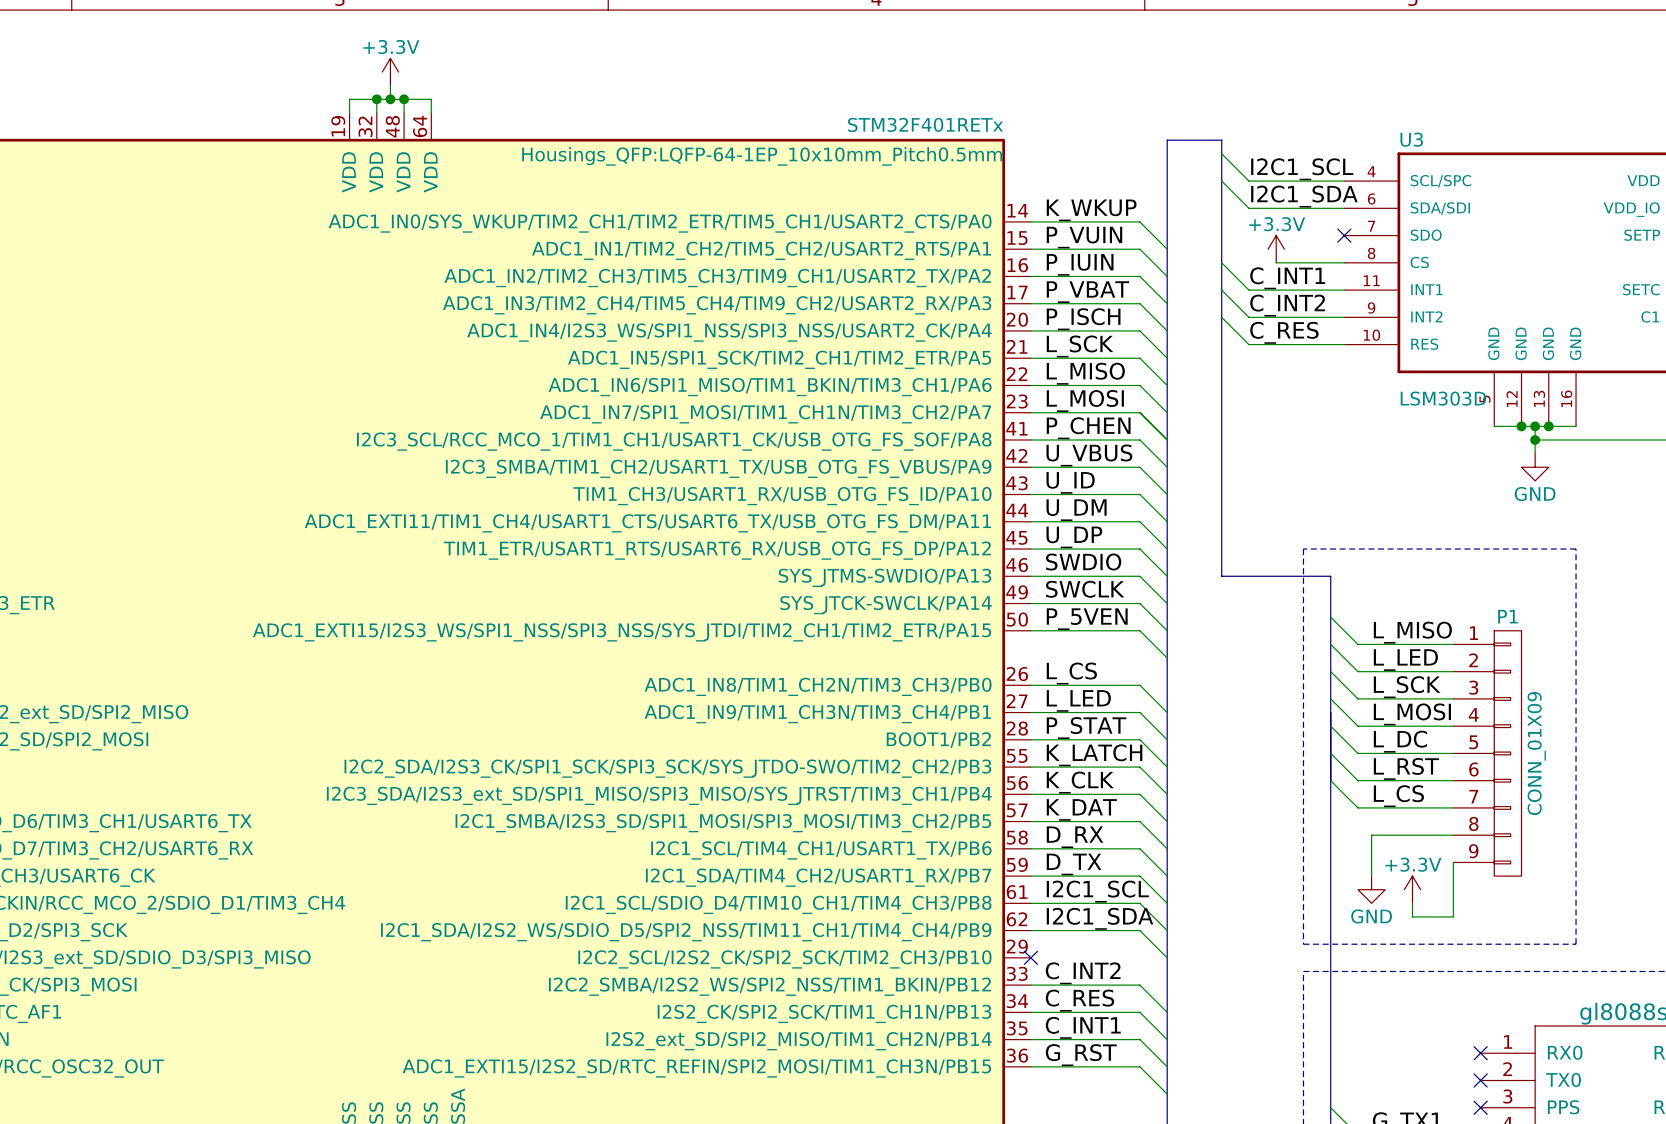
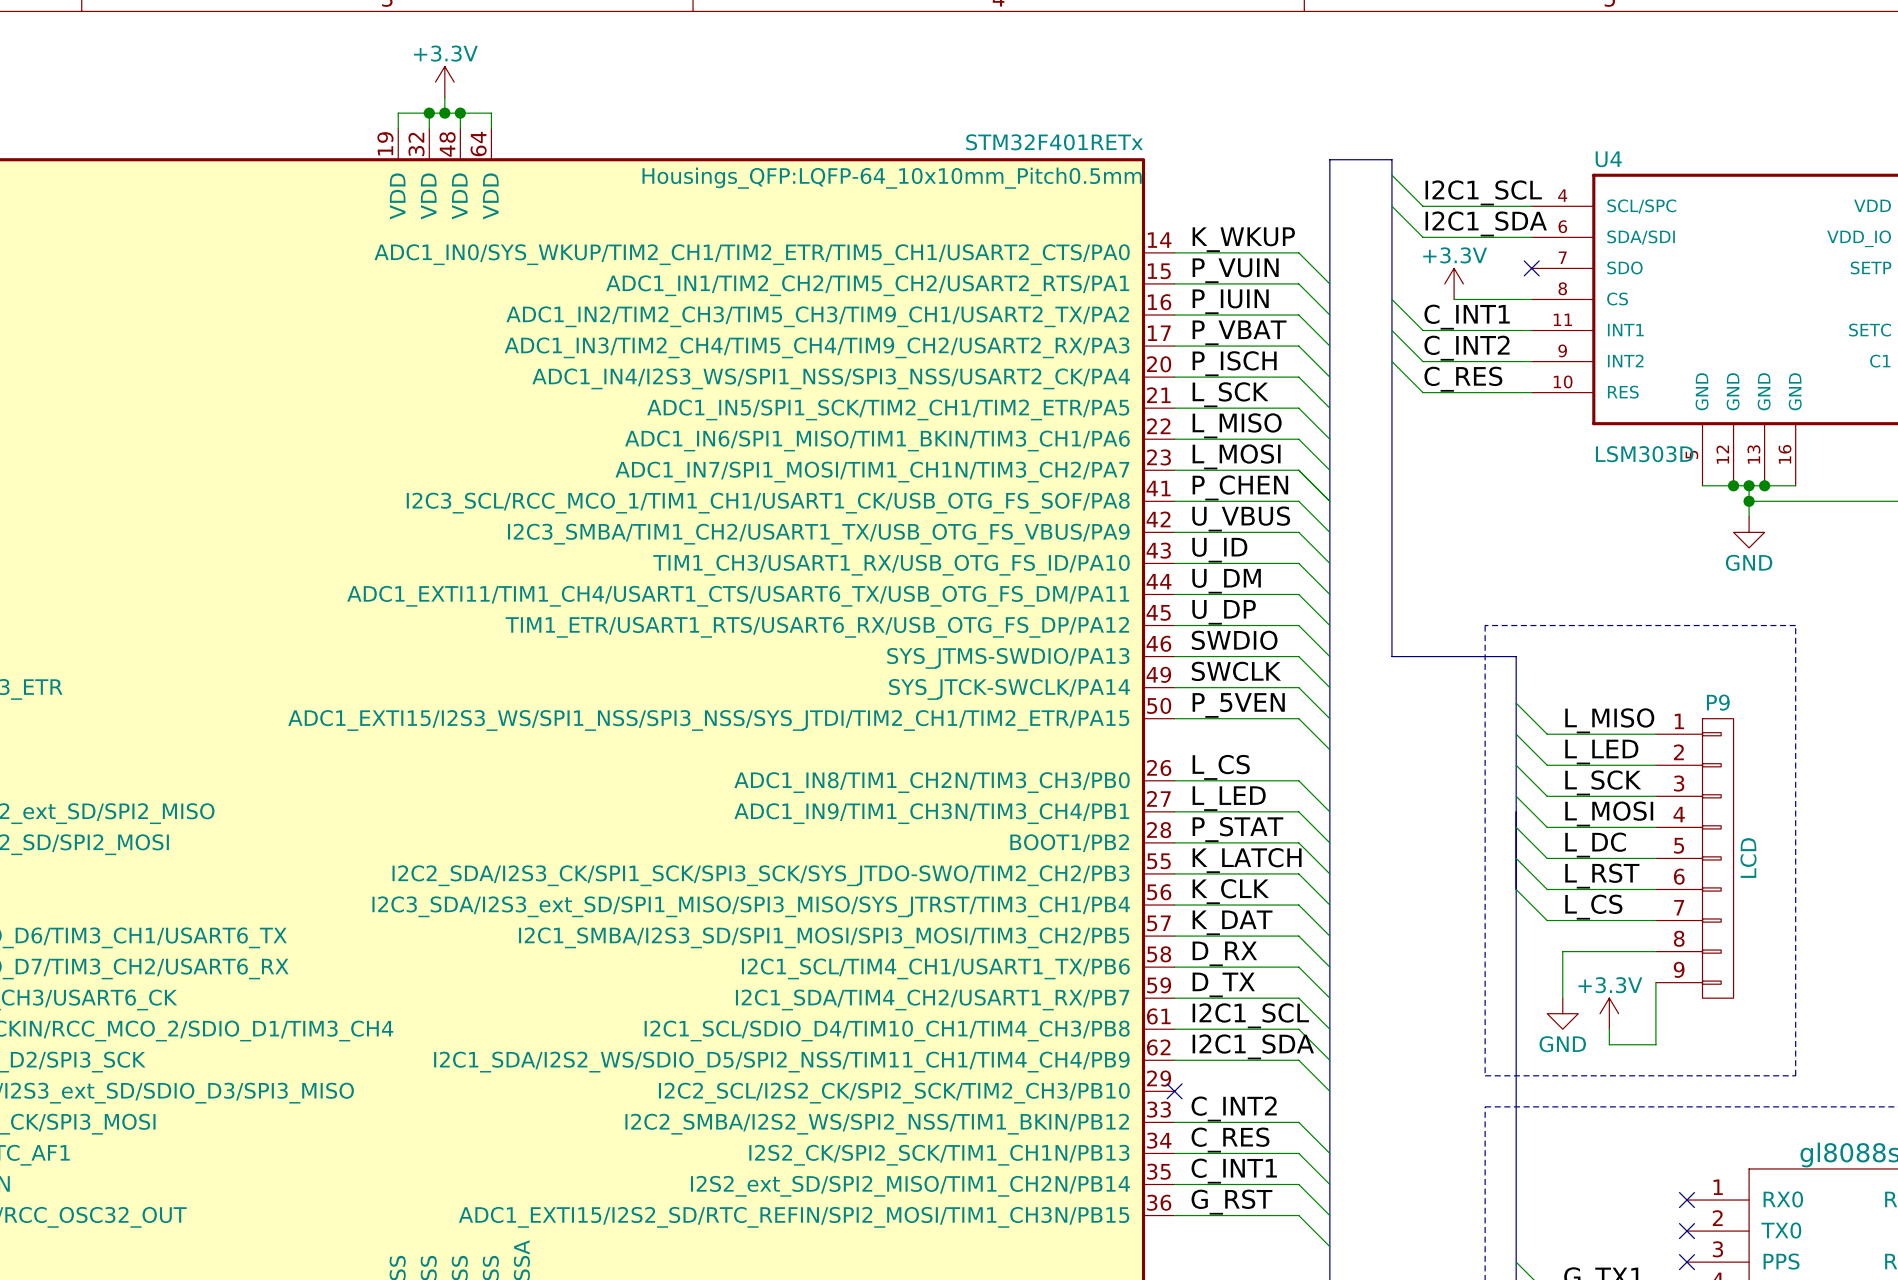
U3 name: U3 (1411, 139) -> U4 (1608, 159)
part text: Housings_QFP:LQFP-64-1EP_10x10mm_Pitch0.5mm (762, 156) -> Housings_QFP:LQFP-64_10x10mm_Pitch0.5mm (892, 178)
P1 name: P1 (1507, 616) -> P9 (1718, 702)
P1 value: CONN_01X09 (1536, 753) -> LCD (1748, 858)

